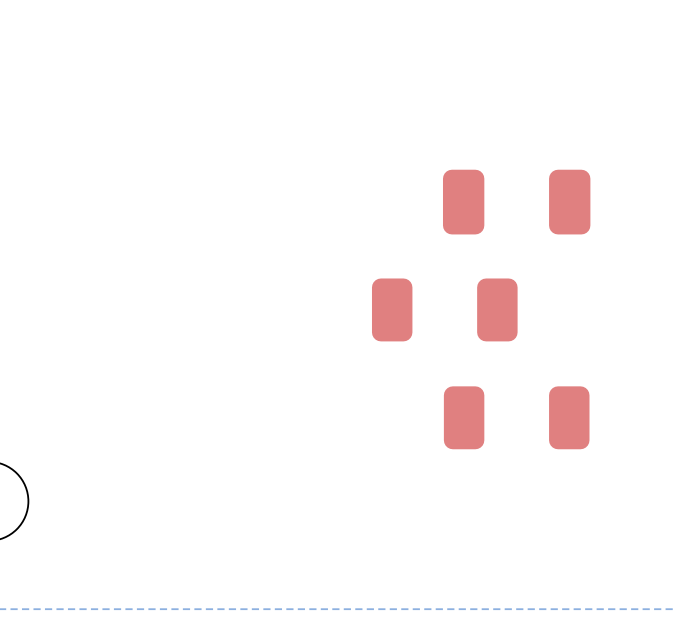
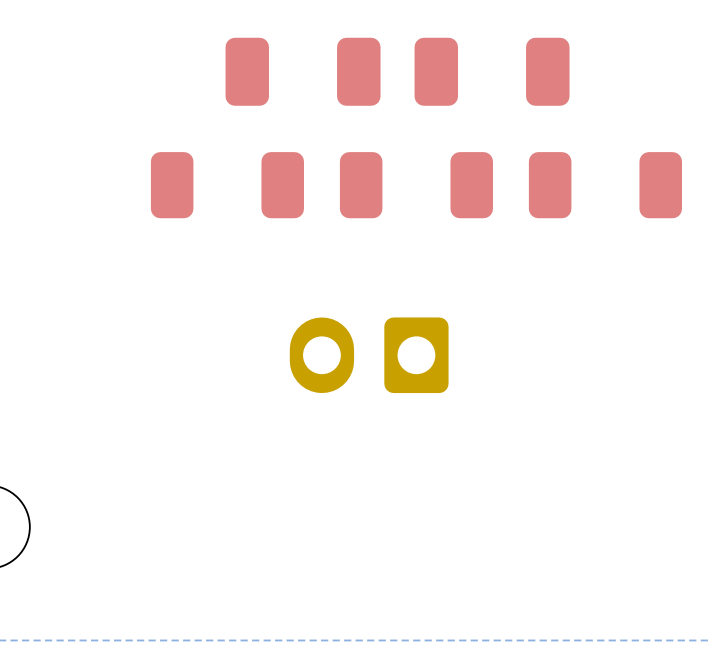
part: none -> (303, 71)
part: none -> (492, 71)
part: none -> (227, 185)
part: none -> (416, 185)
part: none -> (605, 185)
part: (516, 202) -> none
part: (444, 309) -> none
part: none -> (369, 355)
part: (516, 417) -> none

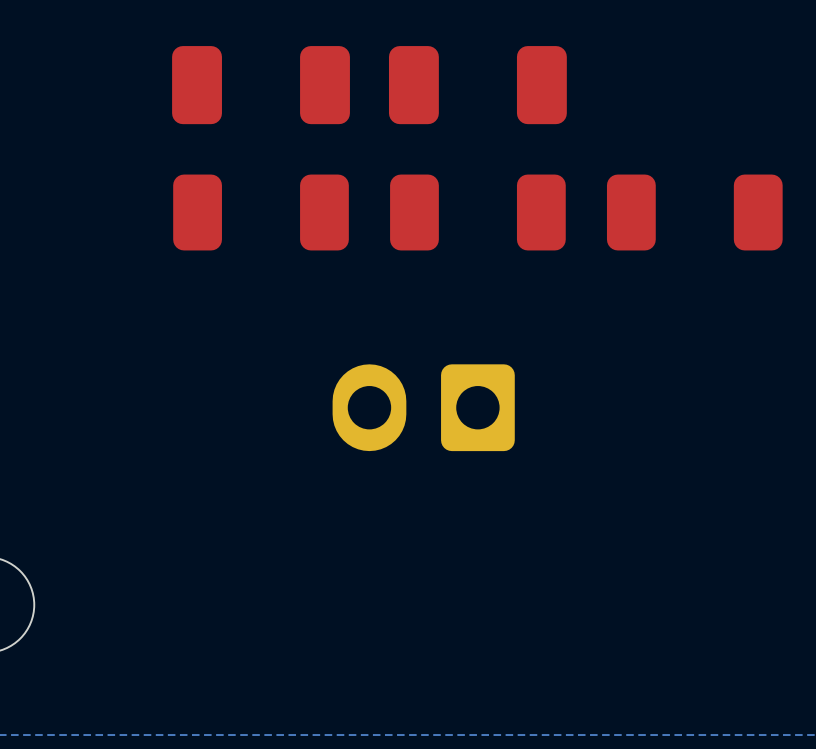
part: (303, 71) -> none
part: (492, 71) -> none
part: none -> (261, 85)
part: none -> (477, 85)

